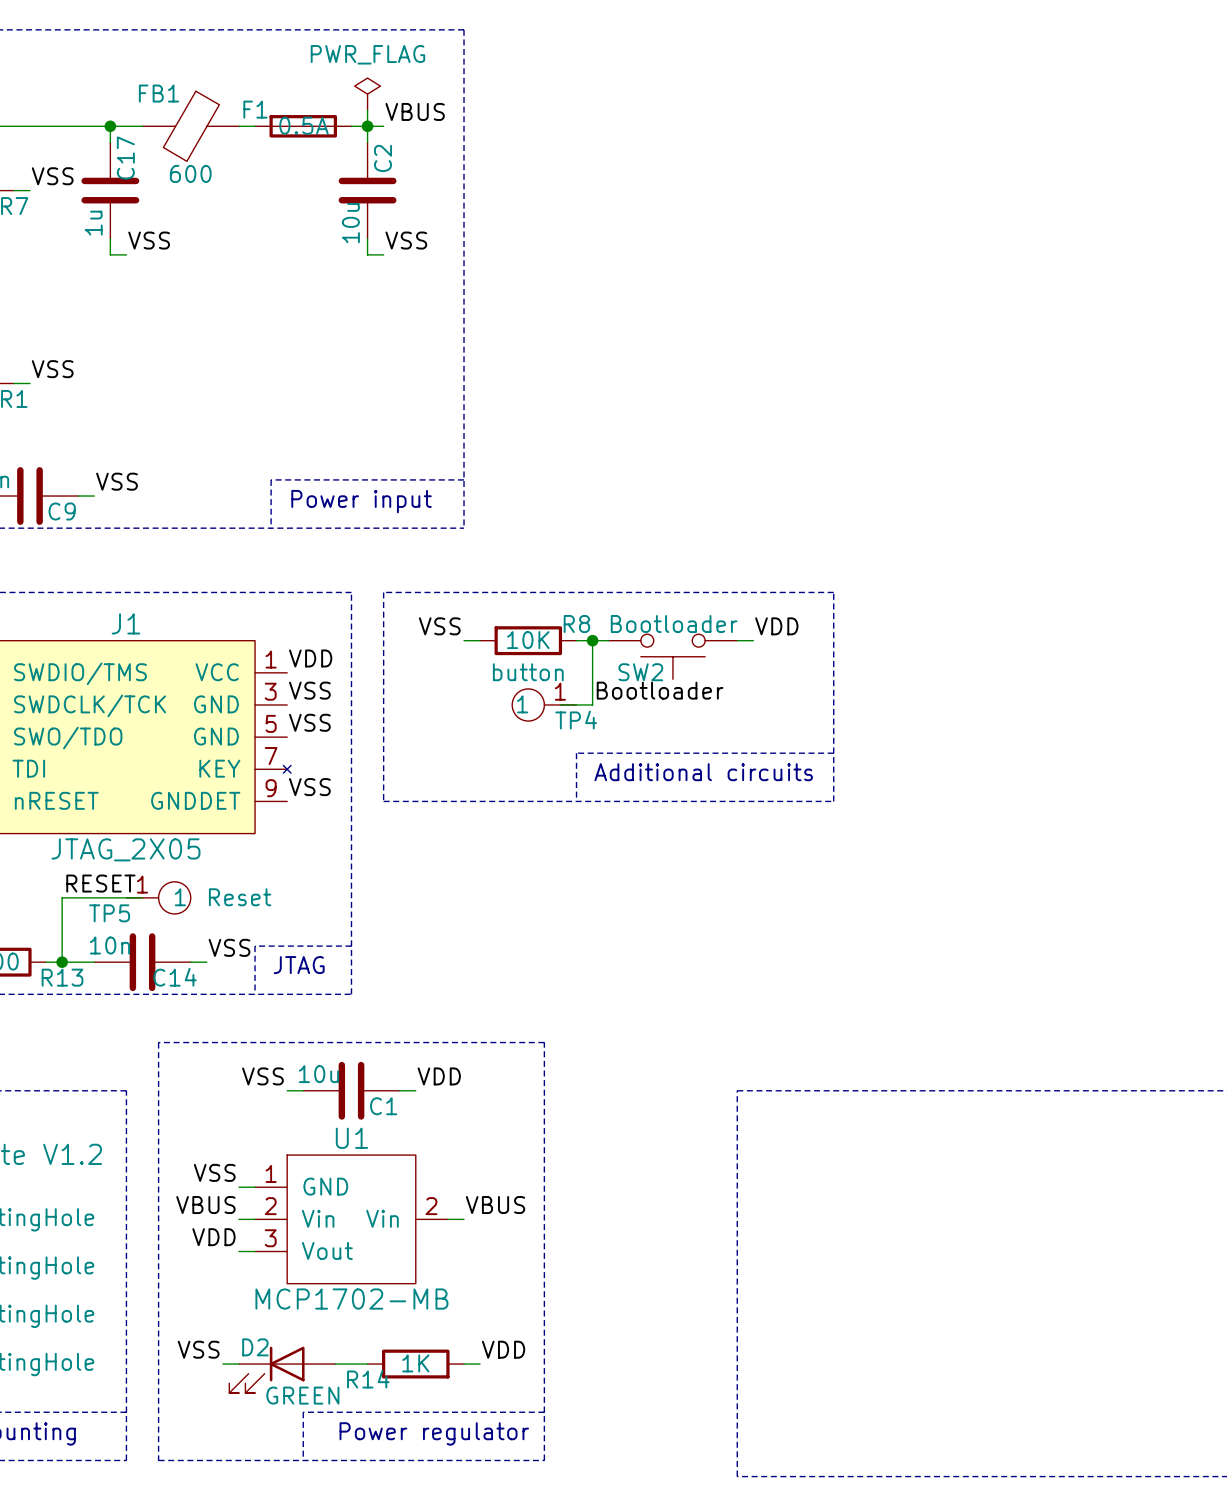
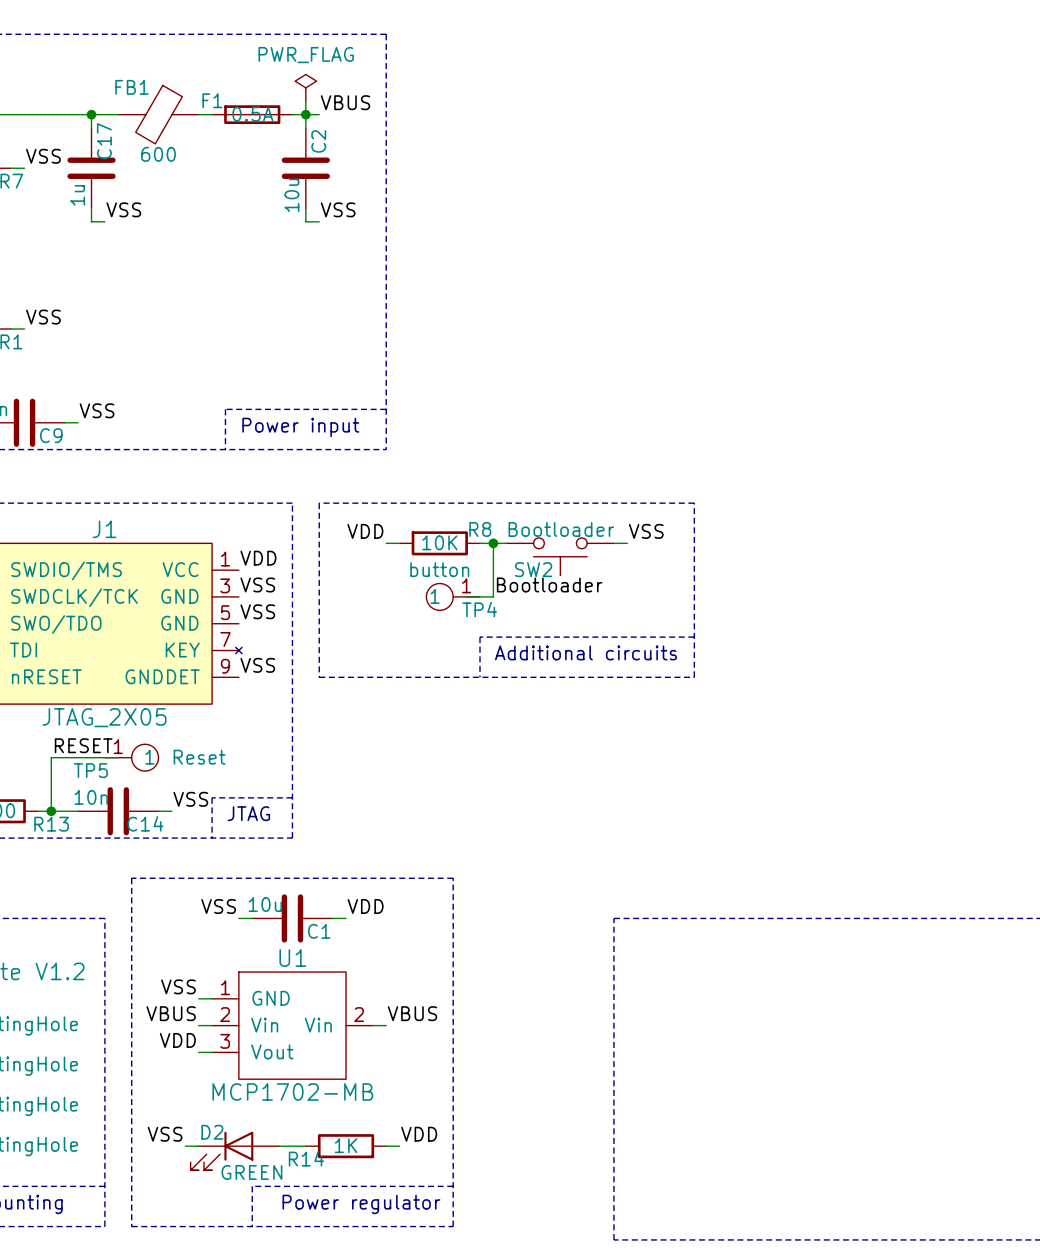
label: VSS (439, 626) -> VDD (365, 531)
label: VDD (776, 626) -> VSS (646, 531)

